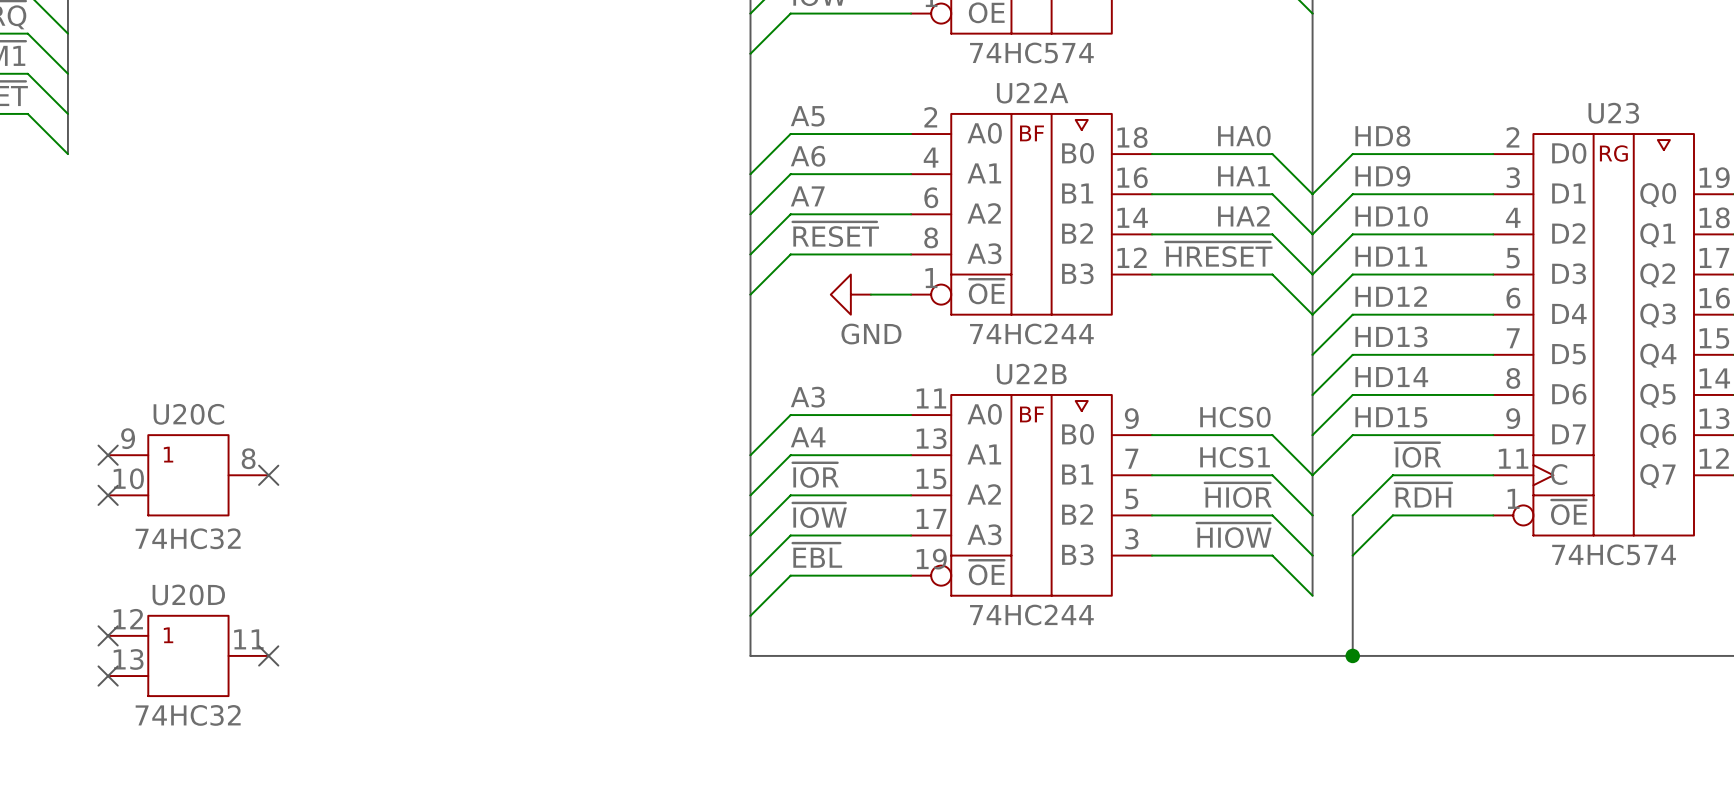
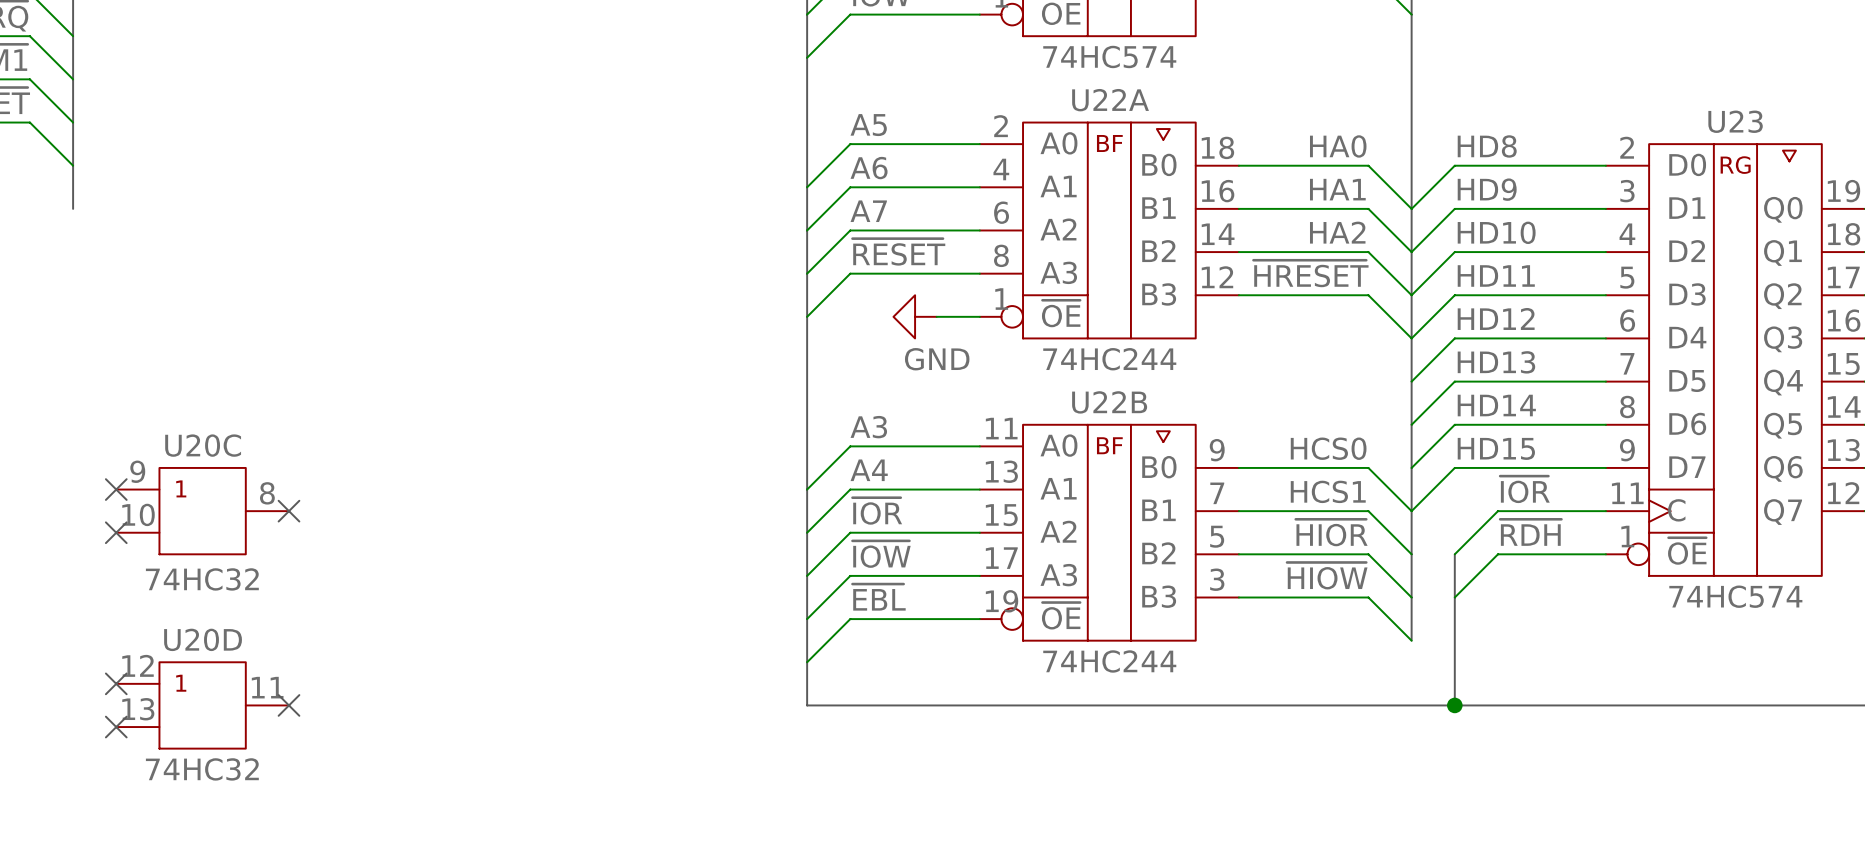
bus: none -> (73, 165) (73, 208)

